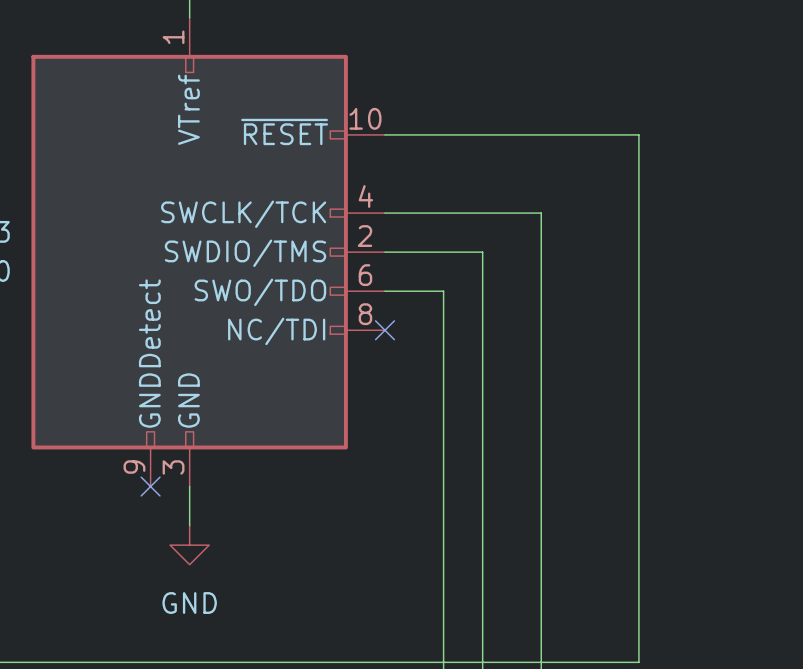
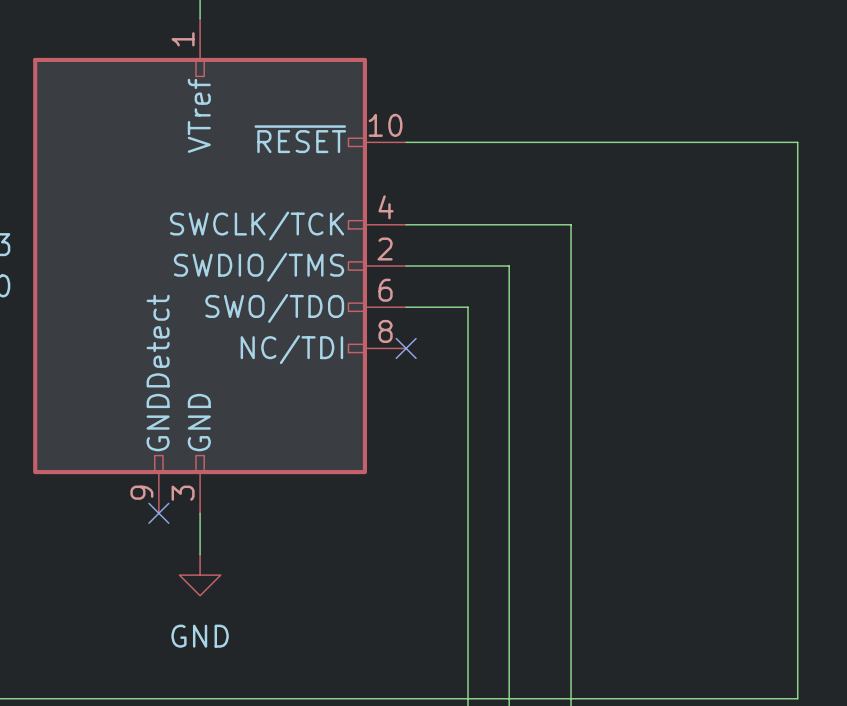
wire: (638, 134) (638, 662) -> (674, 142) (797, 142) (797, 698) (674, 698)

